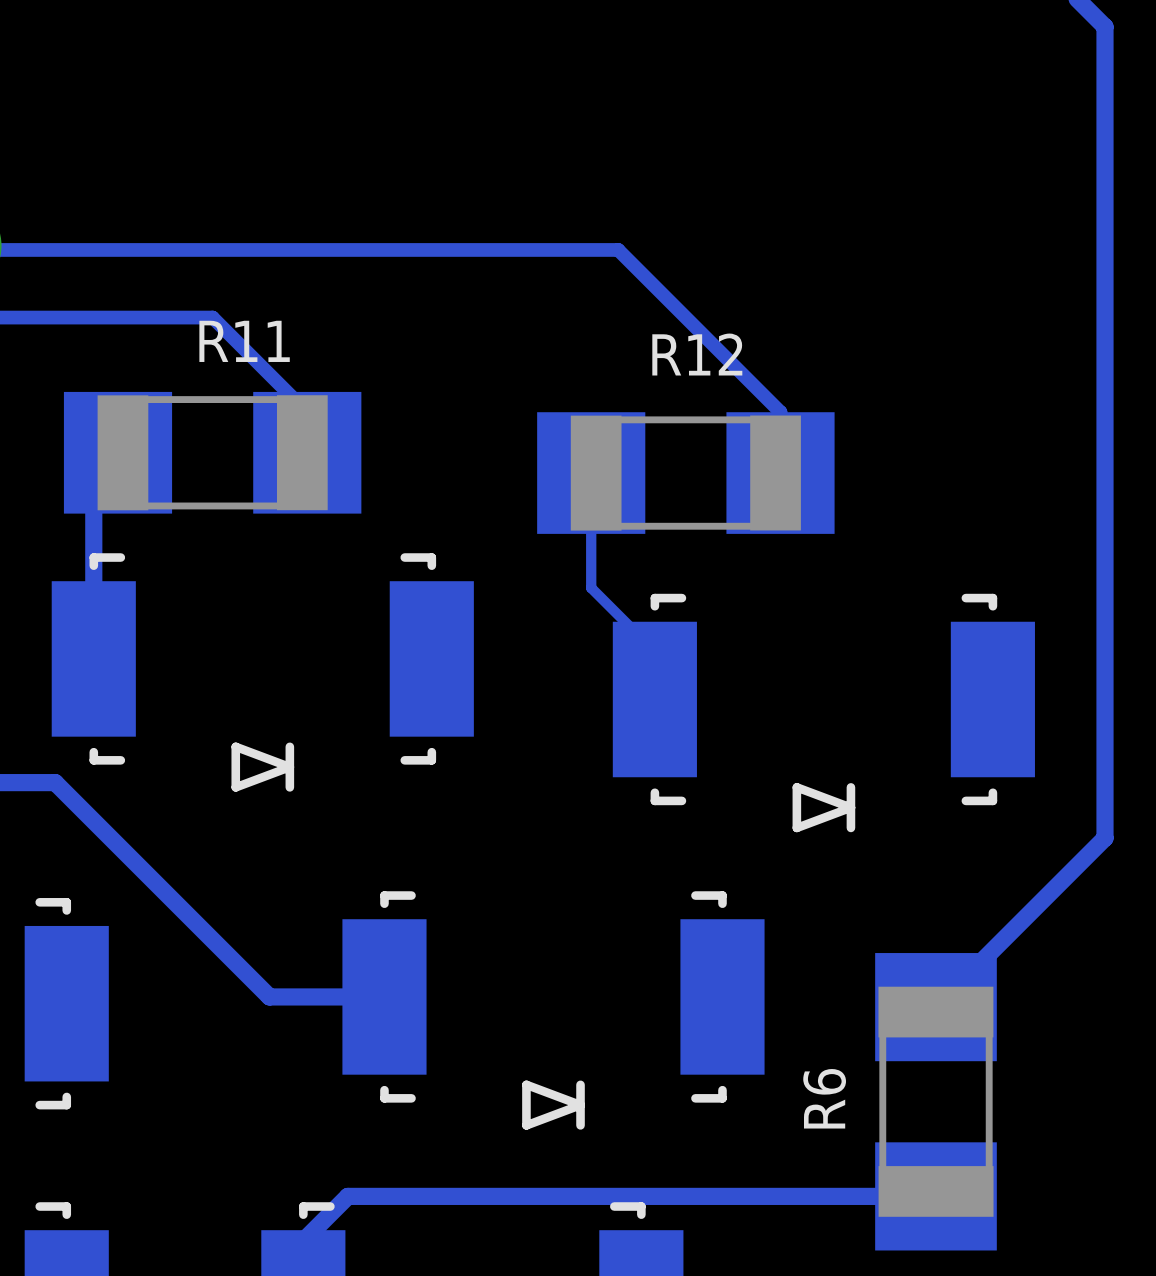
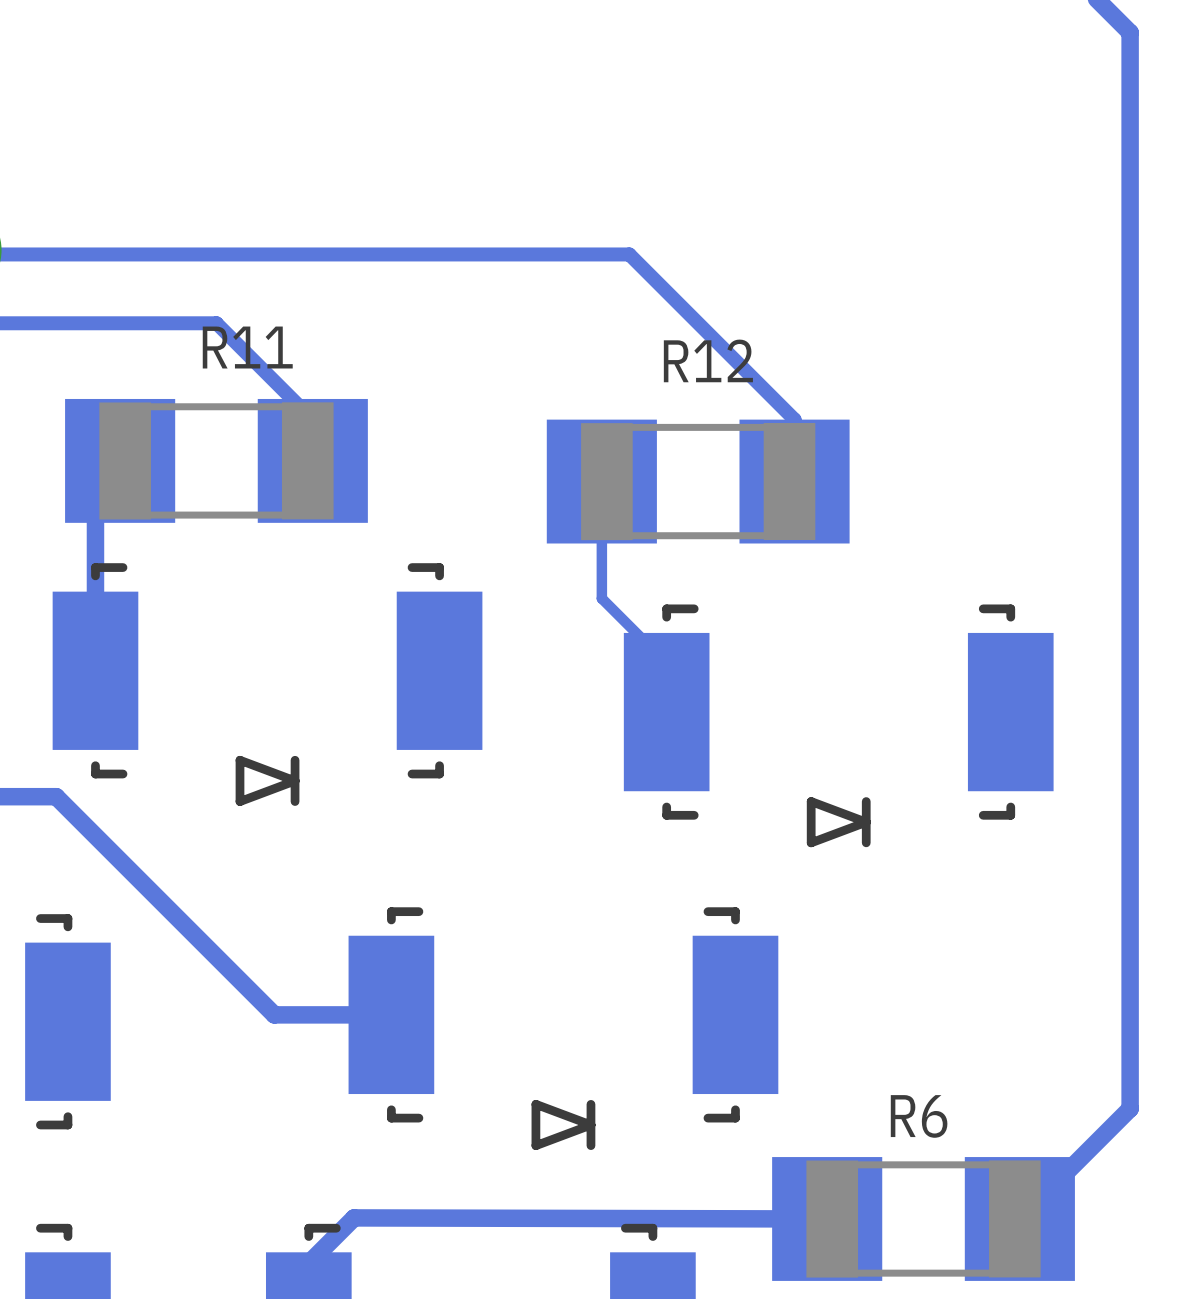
bottom track: (1105, 26) (1105, 838) (935, 1007) -> (1124, 27) (1130, 32) (1130, 1108) (1019, 1218)
R6 rotation: 0° (935, 1101) -> 90° clockwise (923, 1218)
bottom track: (935, 1196) (347, 1196) -> (827, 1218) (354, 1217)

